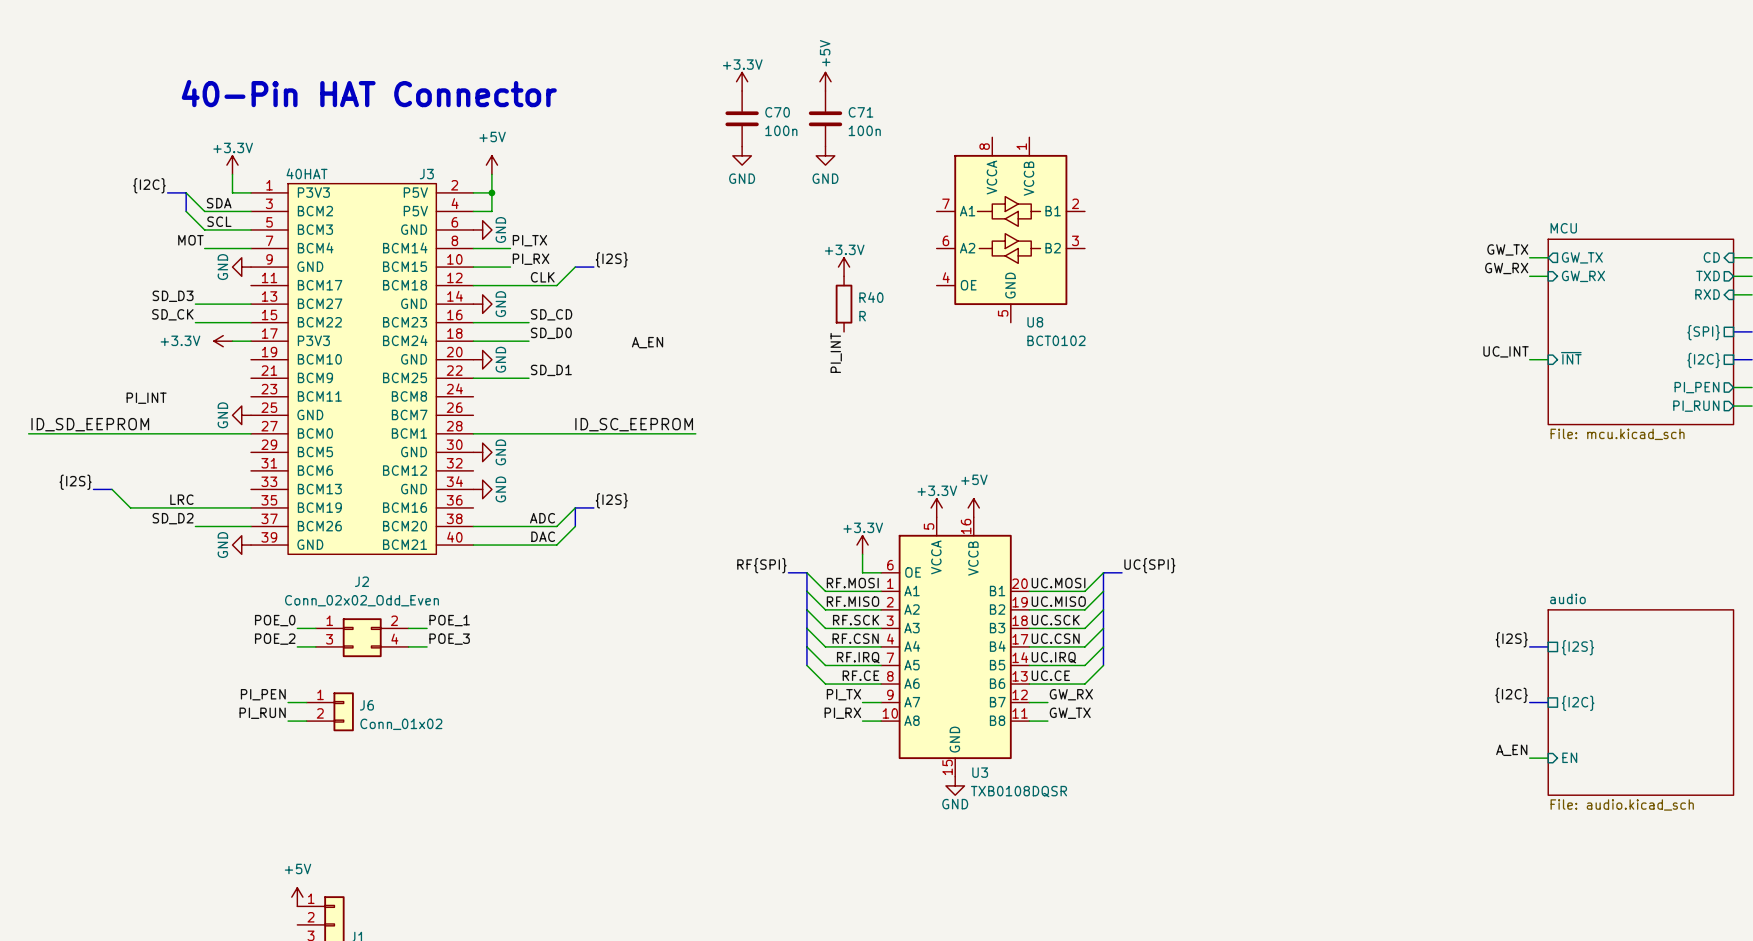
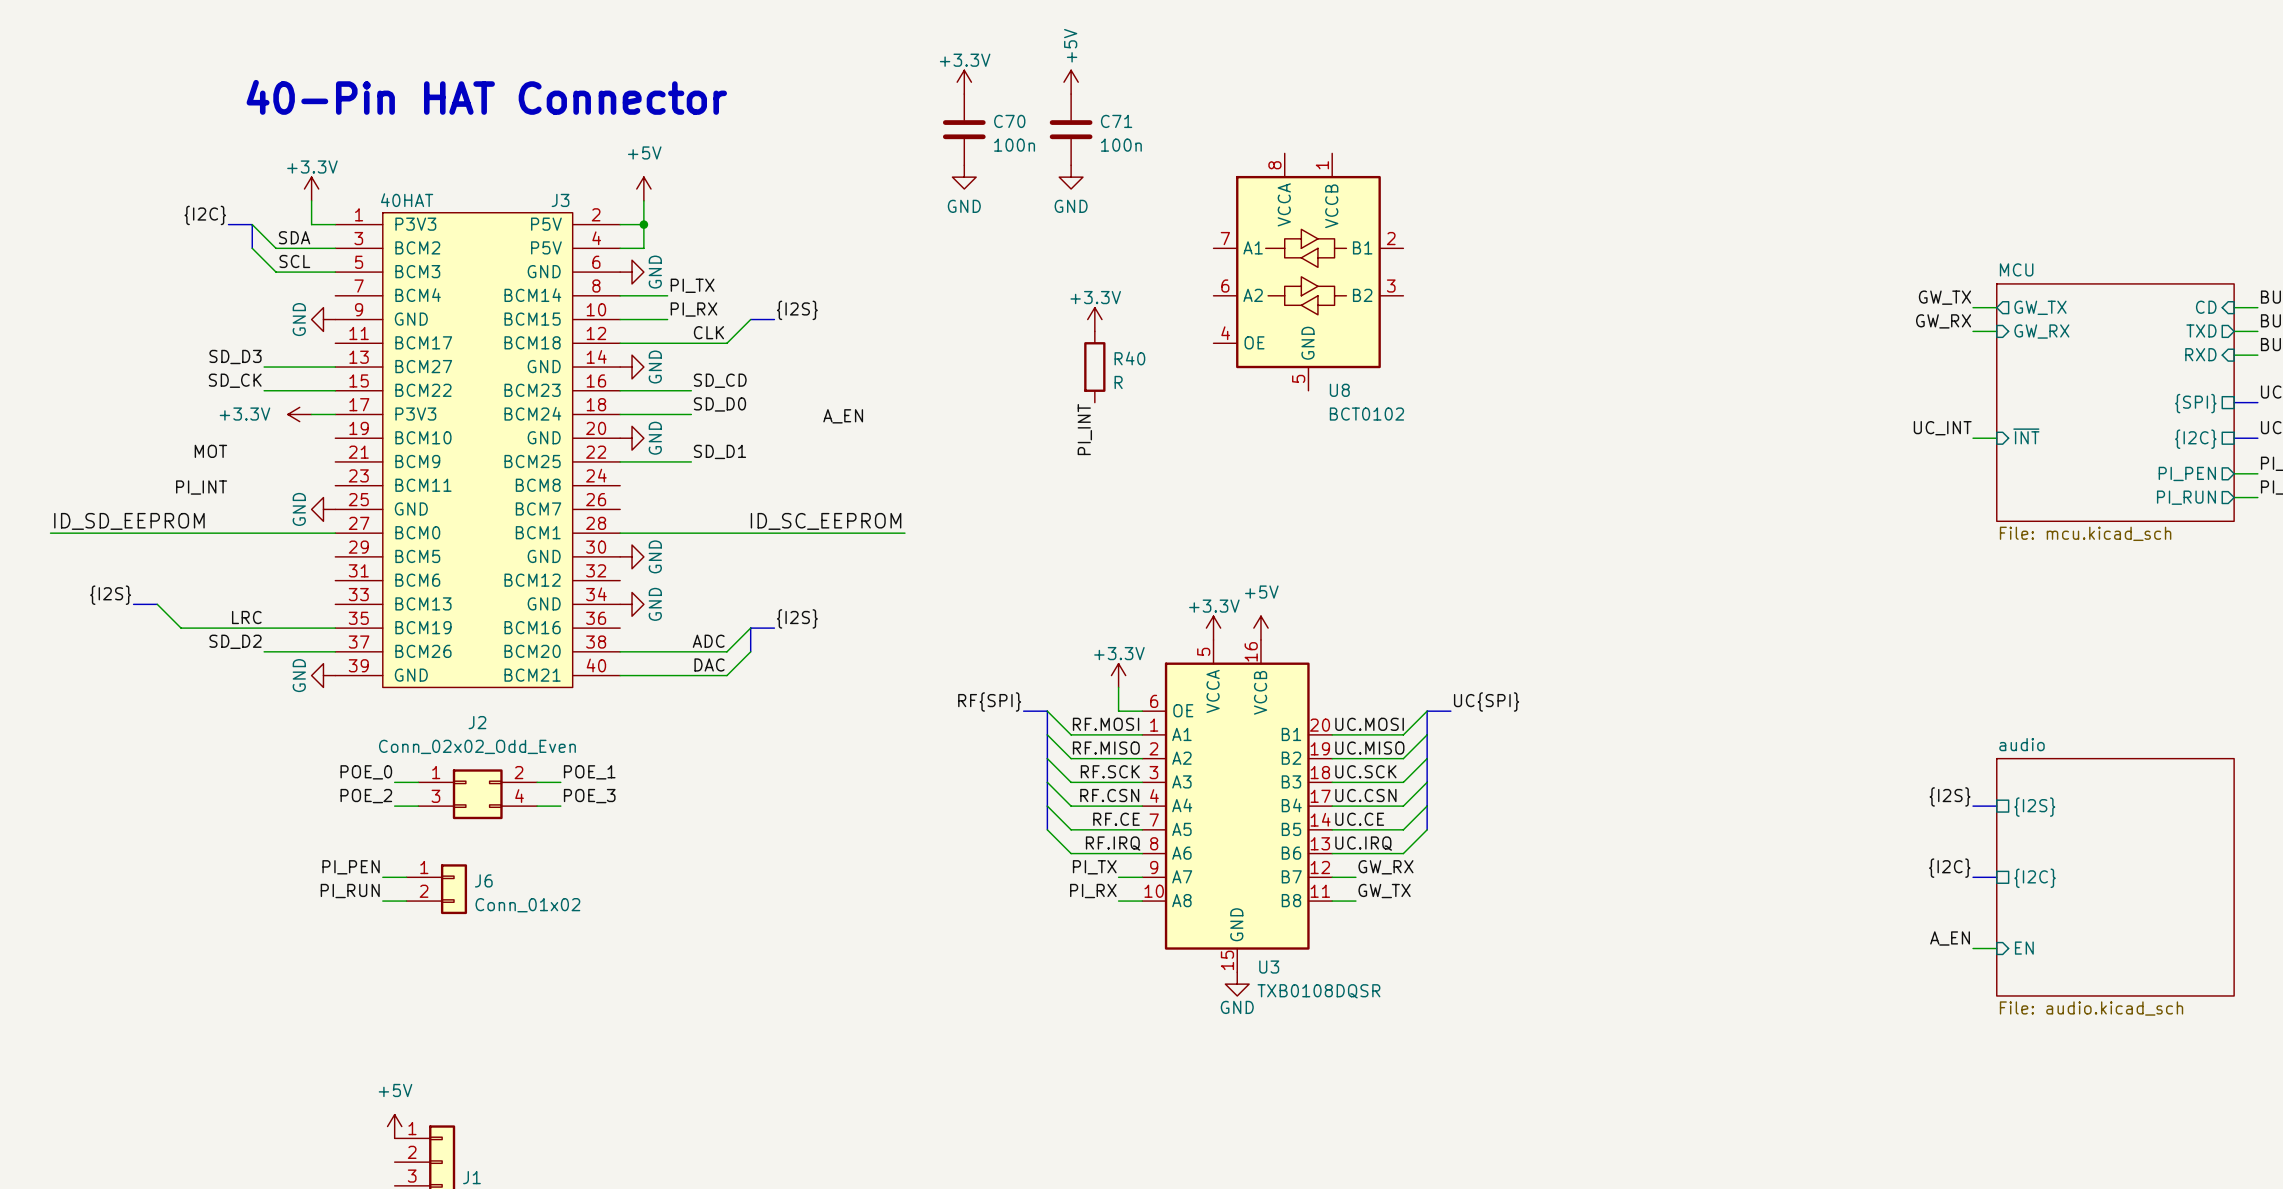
label position: MOT (190, 240) -> MOT (210, 451)
wire: (204, 248) (251, 248) -> none
label: RF.IRQ (858, 657) -> RF.CE (1116, 819)
label: UC.IRQ (1053, 657) -> UC.CE (1359, 819)
label: RF.CE (860, 675) -> RF.IRQ (1113, 843)
label: UC.CE (1050, 675) -> UC.IRQ (1363, 843)

